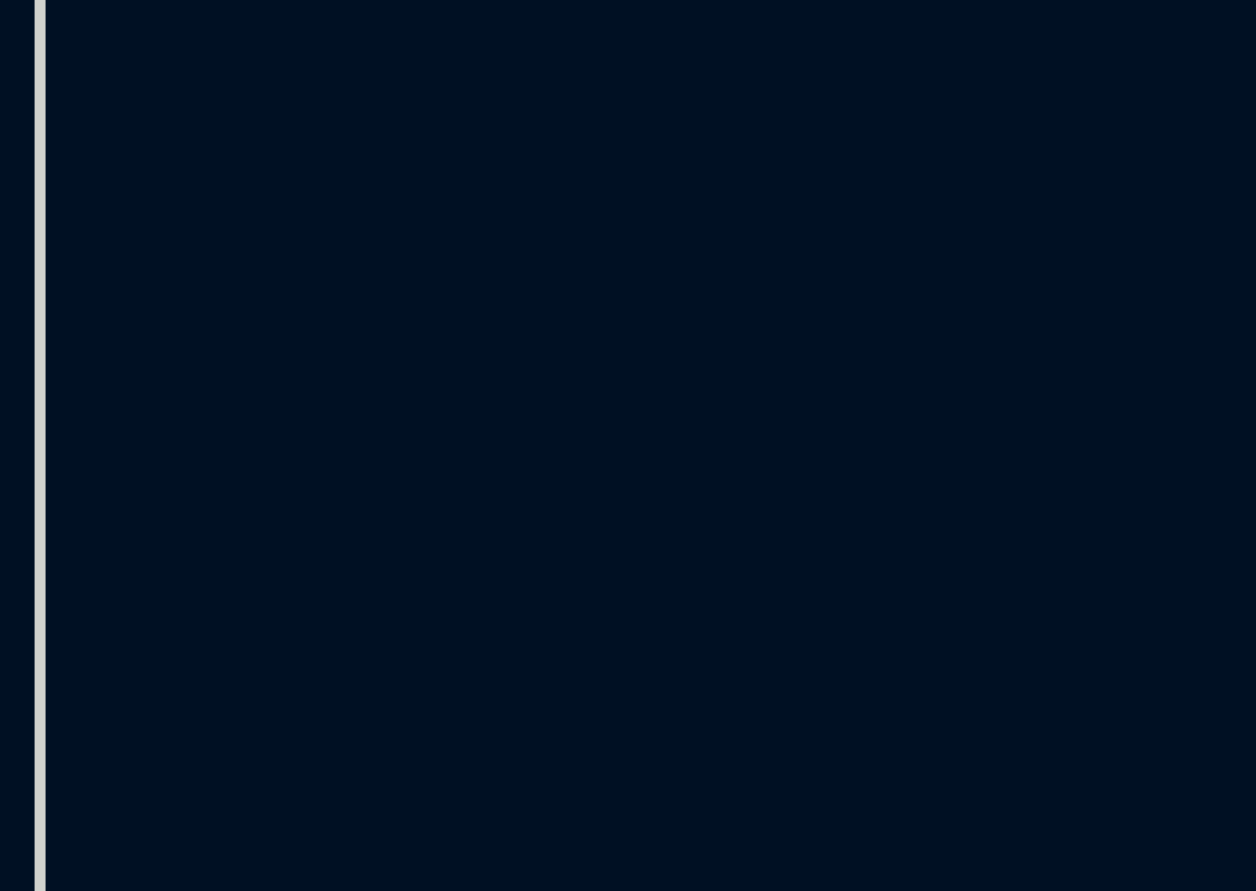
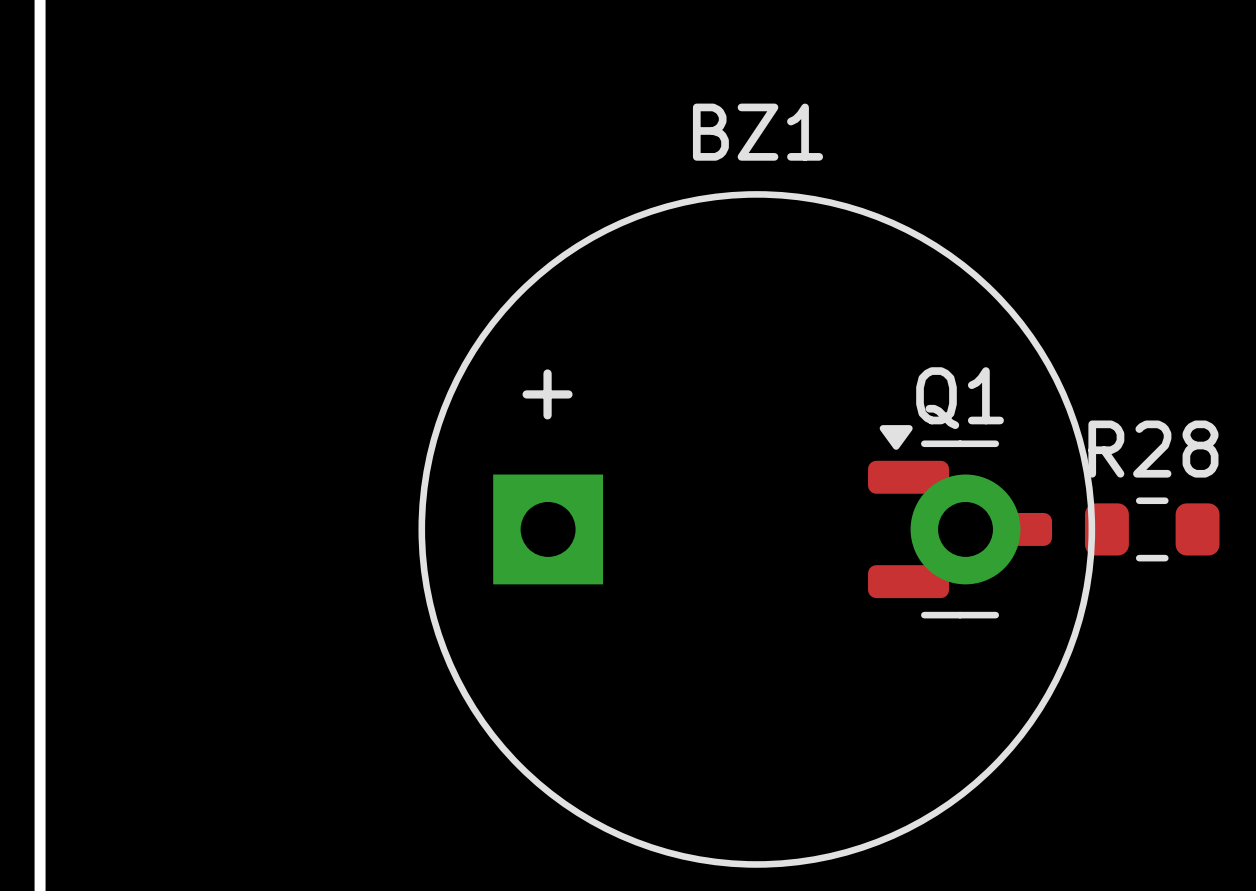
Q1: none -> (960, 521)
BZ1: none -> (756, 529)
R28: none -> (1152, 529)

